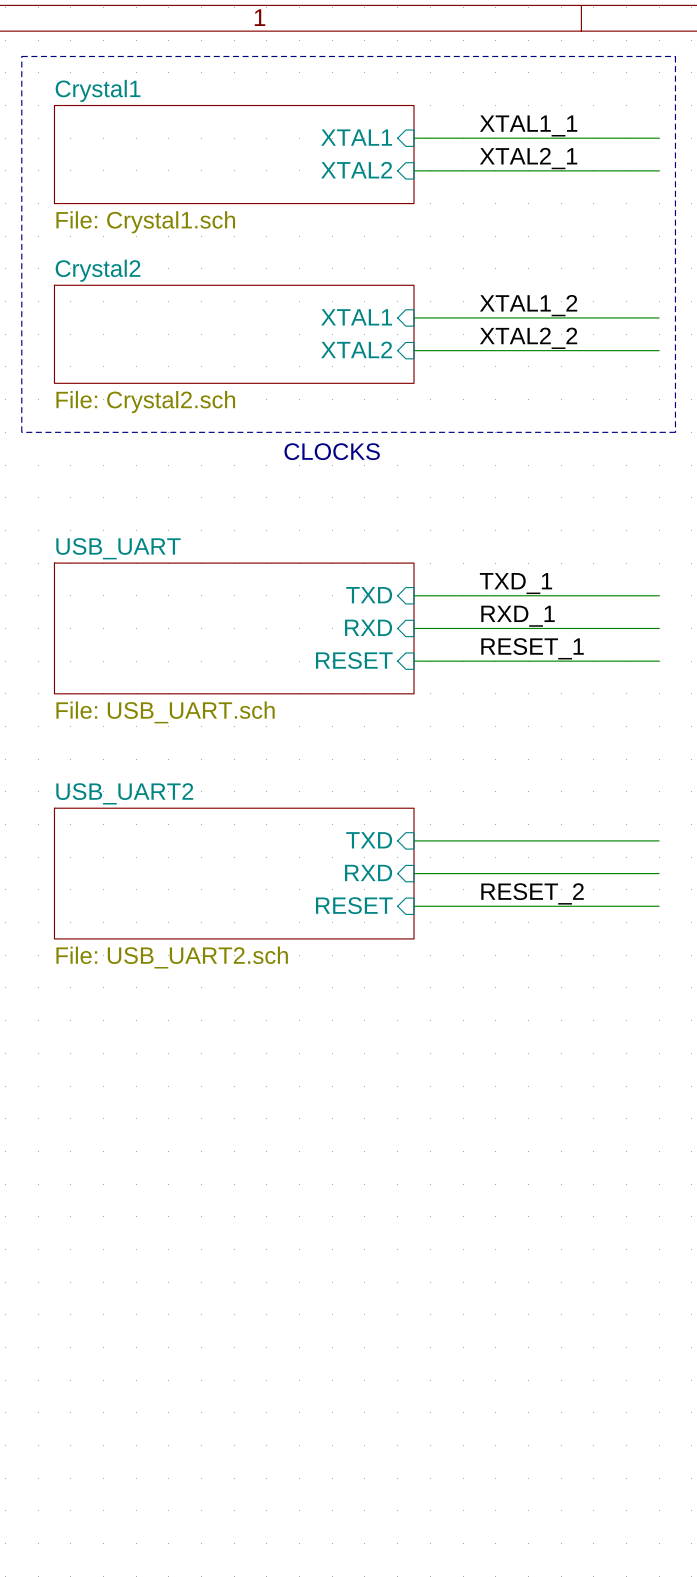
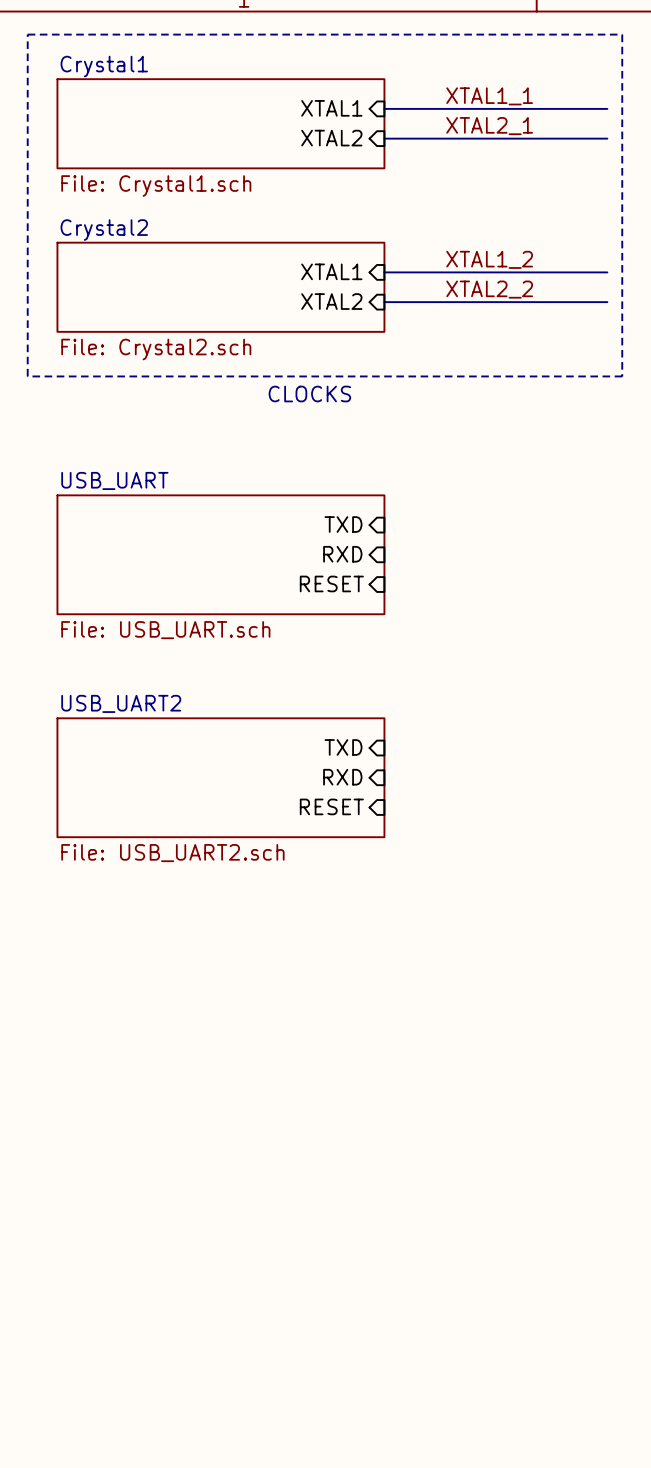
label: TXD_1 (516, 583) -> none
wire: (413, 595) (659, 595) -> none
label: RXD_1 (518, 616) -> none
wire: (413, 628) (659, 628) -> none
label: RESET_1 (532, 648) -> none
wire: (413, 661) (659, 661) -> none
wire: (413, 840) (659, 840) -> none
wire: (413, 873) (659, 873) -> none
label: RESET_2 (532, 893) -> none
wire: (413, 906) (659, 906) -> none

